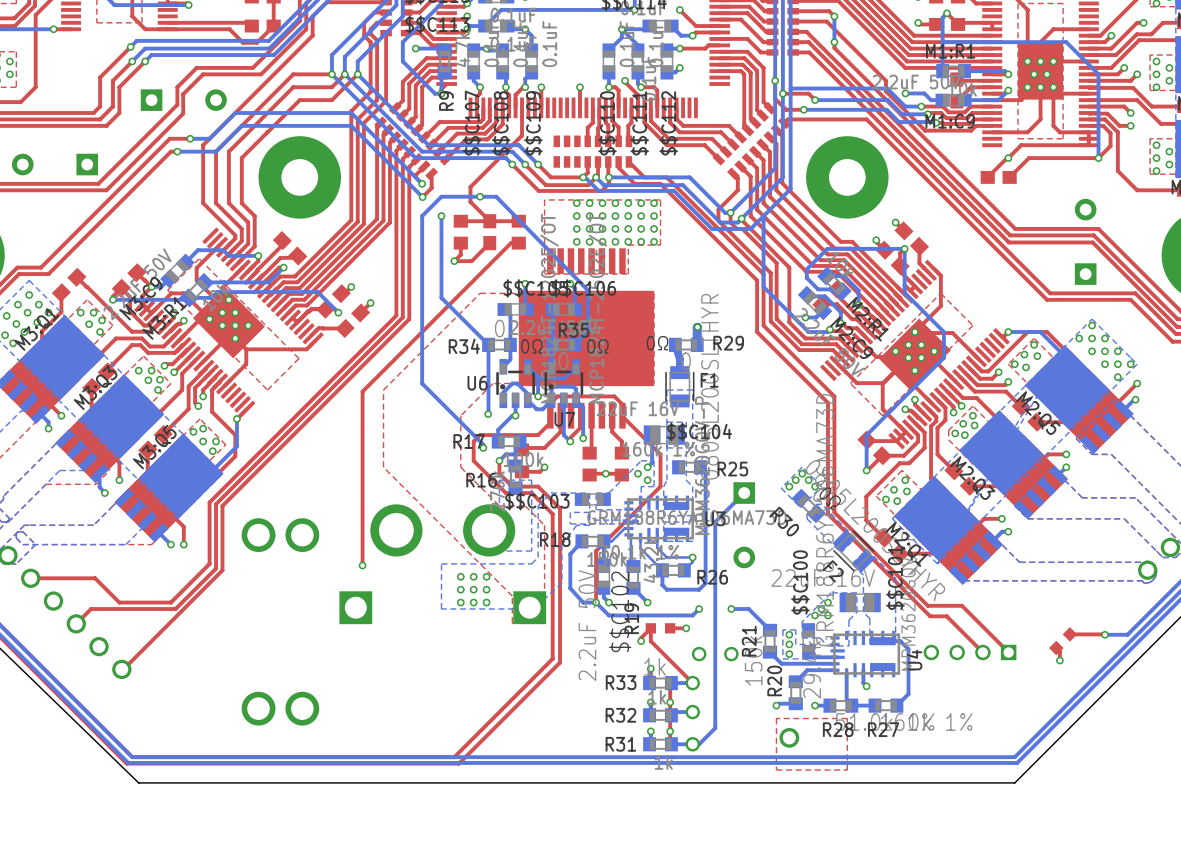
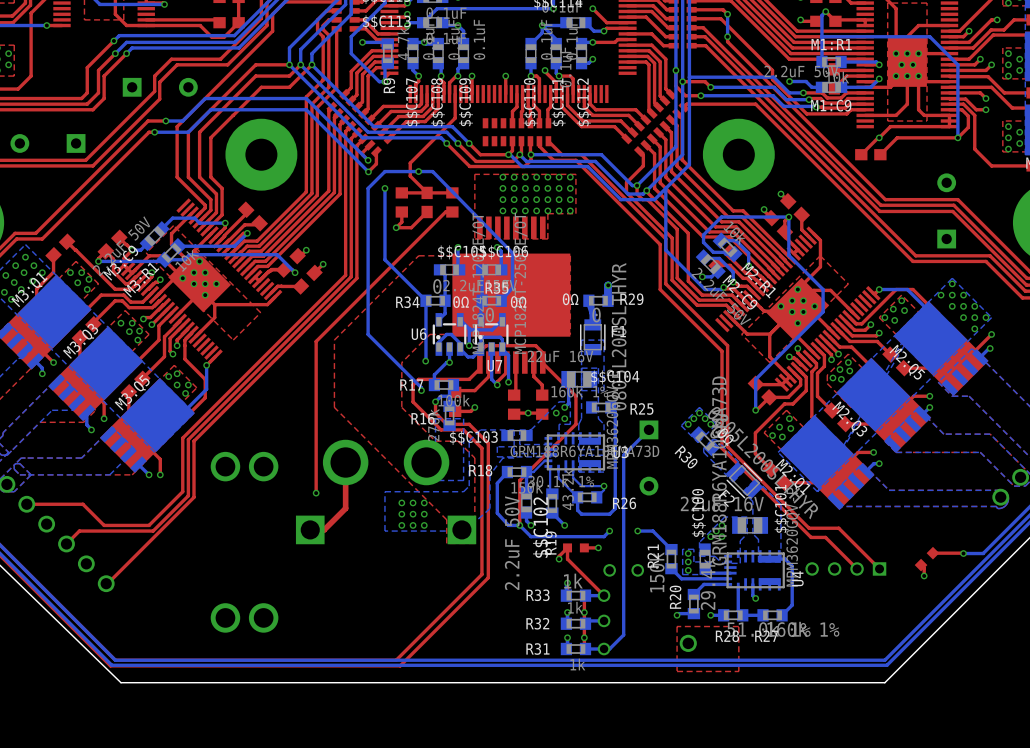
top track: none -> (345, 462) (345, 508) (324, 529) (310, 529)

